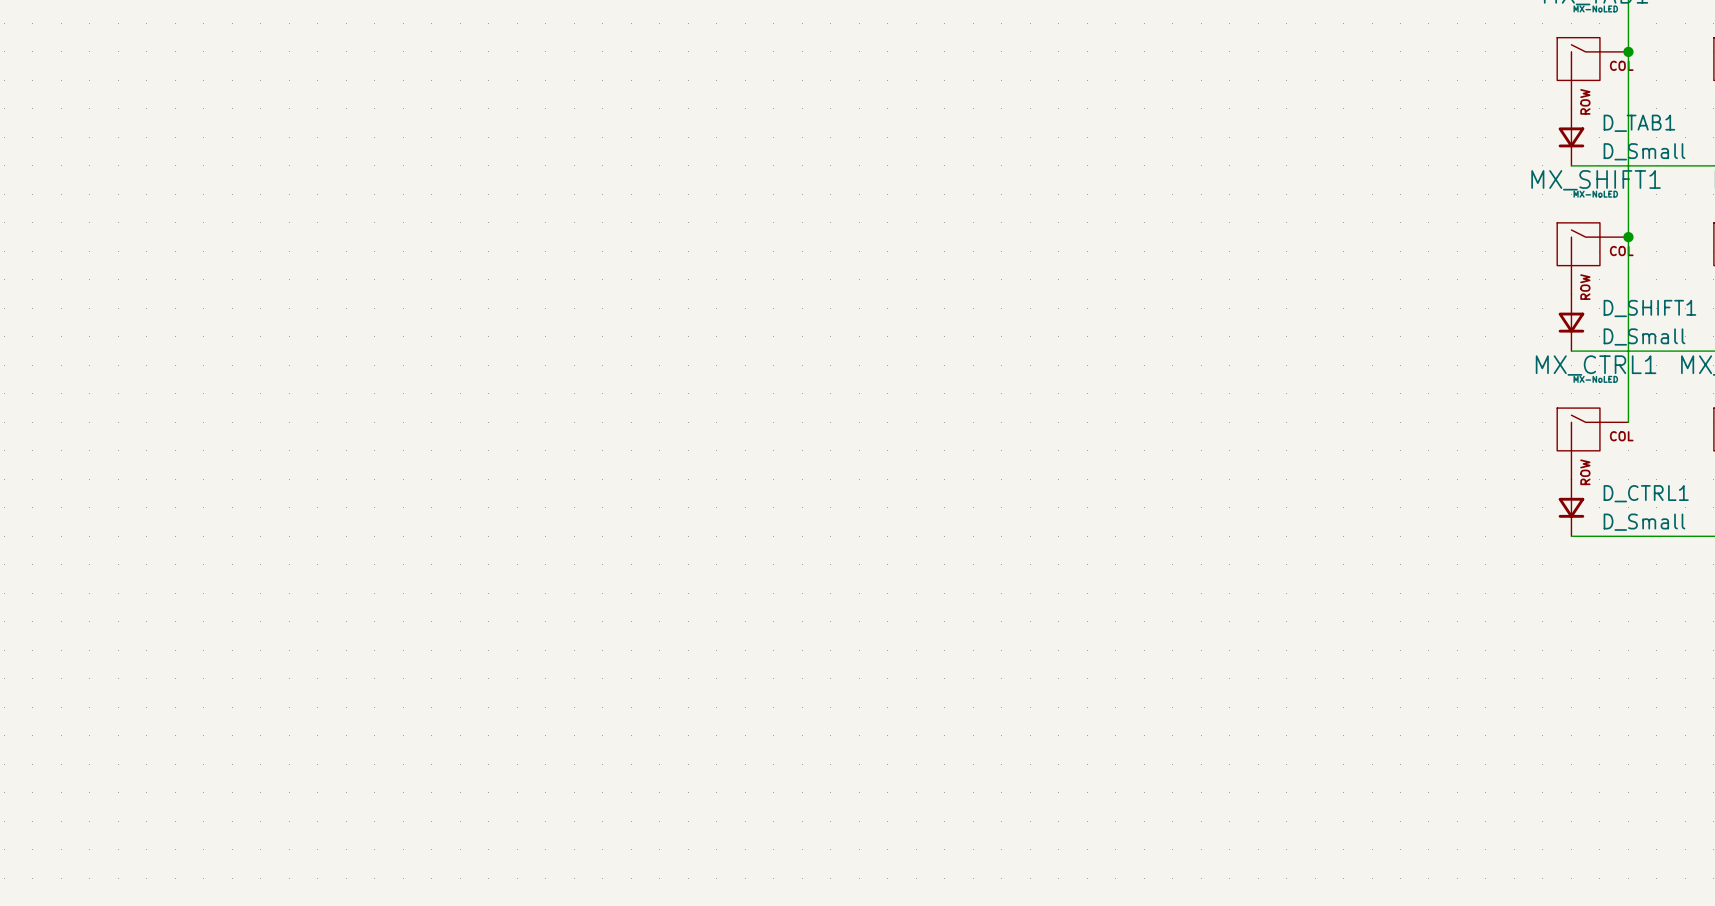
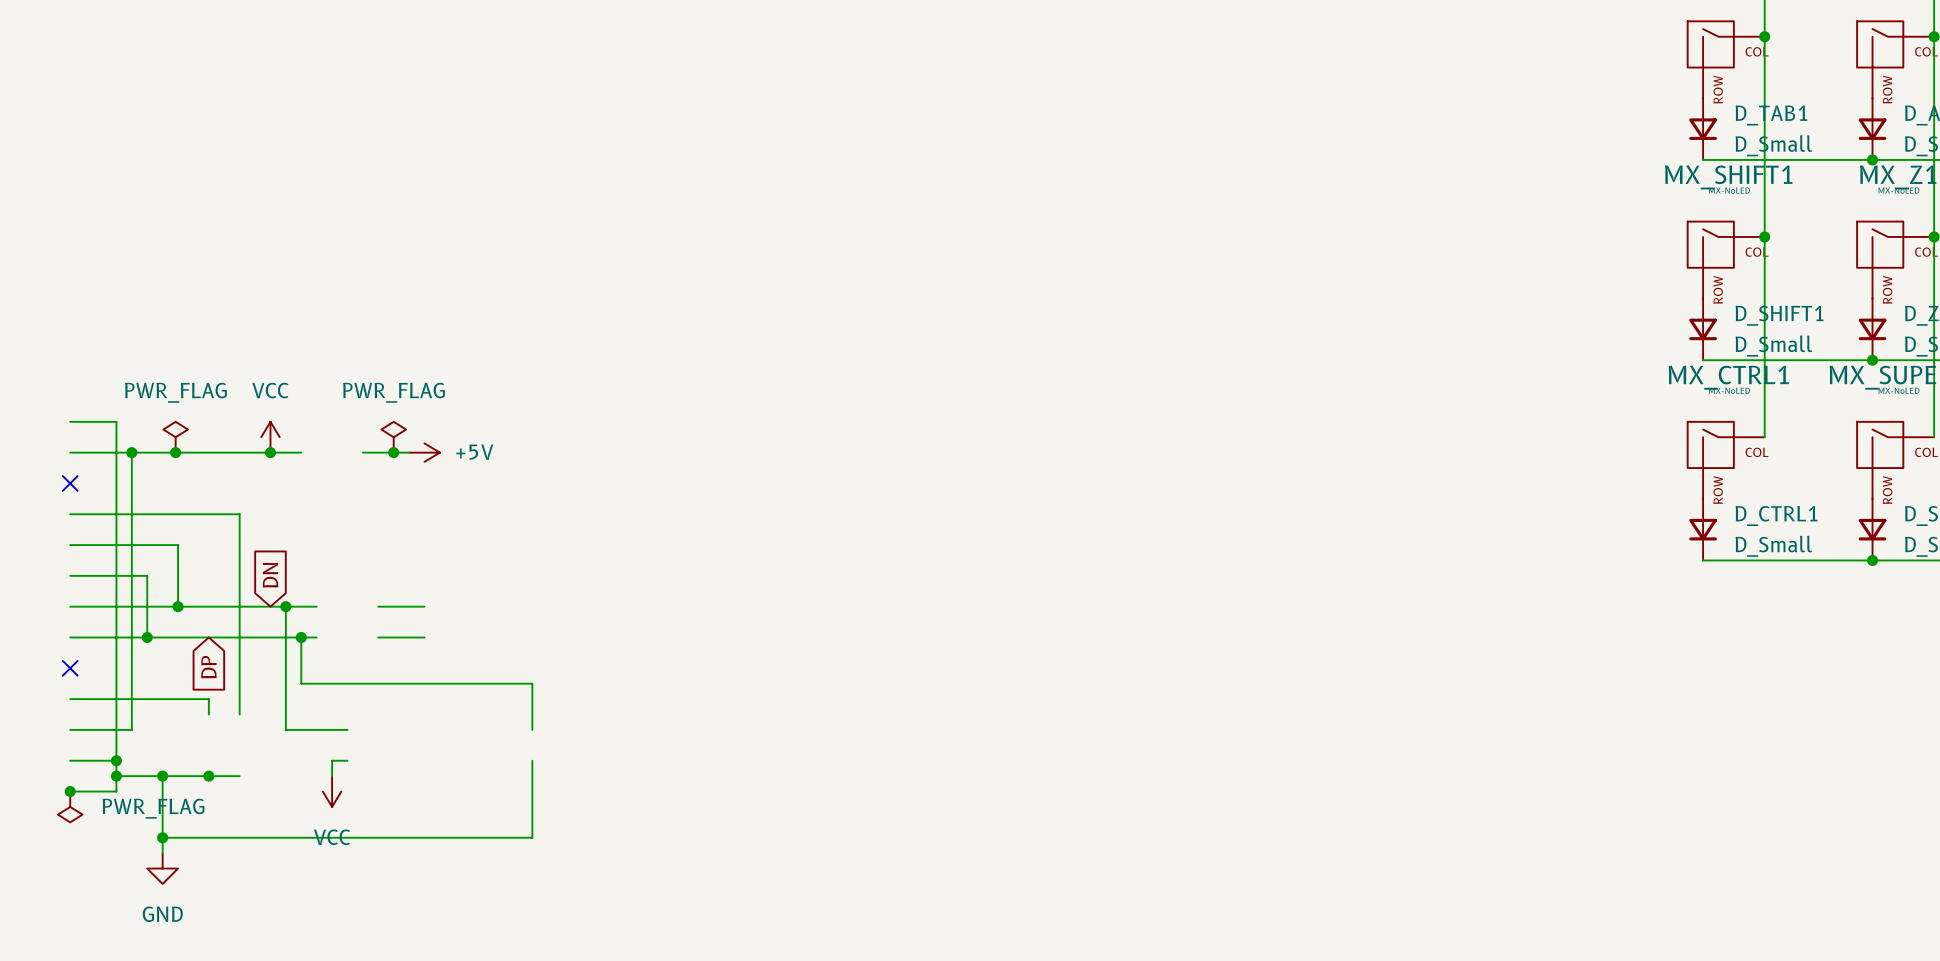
wire: none -> (70, 421) (116, 421) (116, 791) (70, 791)
power symbol: none -> PWR_FLAG (175, 437)
power symbol: none -> VCC (270, 437)
power symbol: none -> PWR_FLAG (393, 437)
wire: none -> (70, 452) (301, 452)
wire: none -> (131, 452) (131, 729) (70, 729)
junction: none -> (131, 452)
junction: none -> (175, 452)
junction: none -> (270, 452)
wire: none -> (362, 452) (409, 452)
junction: none -> (393, 452)
power symbol: none -> +5V (424, 452)
no-connect mark: none -> (70, 483)
wire: none -> (70, 514) (239, 514) (239, 714)
wire: none -> (70, 545) (178, 545) (178, 606)
global label: none -> DN (270, 575)
wire: none -> (70, 575) (147, 575) (147, 637)
wire: none -> (70, 606) (316, 606)
junction: none -> (178, 606)
wire: none -> (285, 606) (285, 729) (347, 729)
junction: none -> (285, 606)
wire: none -> (378, 606) (424, 606)
wire: none -> (70, 637) (316, 637)
junction: none -> (147, 637)
wire: none -> (301, 637) (301, 683) (532, 683) (532, 729)
junction: none -> (301, 637)
wire: none -> (378, 637) (424, 637)
no-connect mark: none -> (70, 668)
global label: none -> DP (208, 667)
wire: none -> (70, 699) (208, 699) (208, 714)
wire: none -> (70, 760) (116, 760)
junction: none -> (116, 760)
wire: none -> (347, 760) (332, 760) (332, 776)
wire: none -> (532, 760) (532, 837) (162, 837)
wire: none -> (116, 776) (239, 776)
junction: none -> (116, 776)
wire: none -> (162, 776) (162, 853)
junction: none -> (162, 776)
junction: none -> (208, 776)
junction: none -> (70, 791)
power symbol: none -> VCC (332, 791)
power symbol: none -> PWR_FLAG (70, 806)
junction: none -> (162, 837)
power symbol: none -> GND (162, 868)

